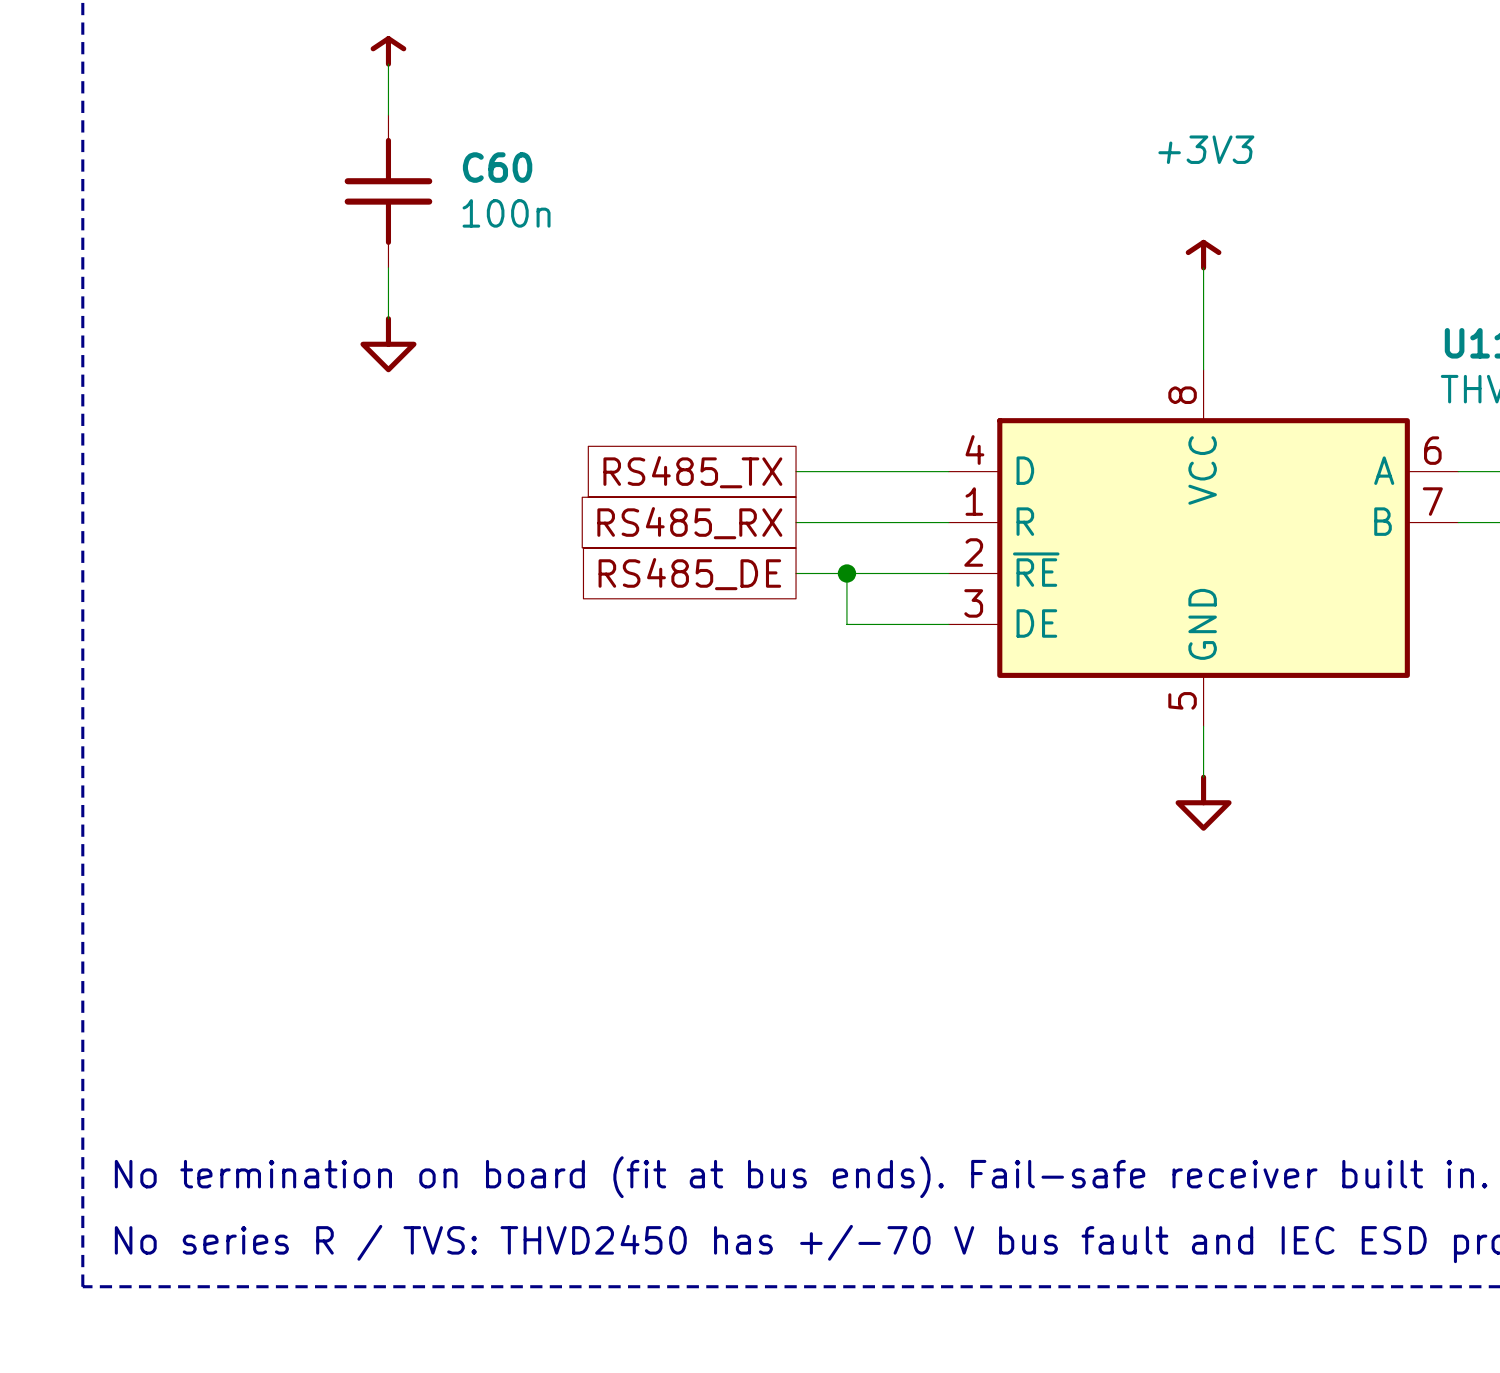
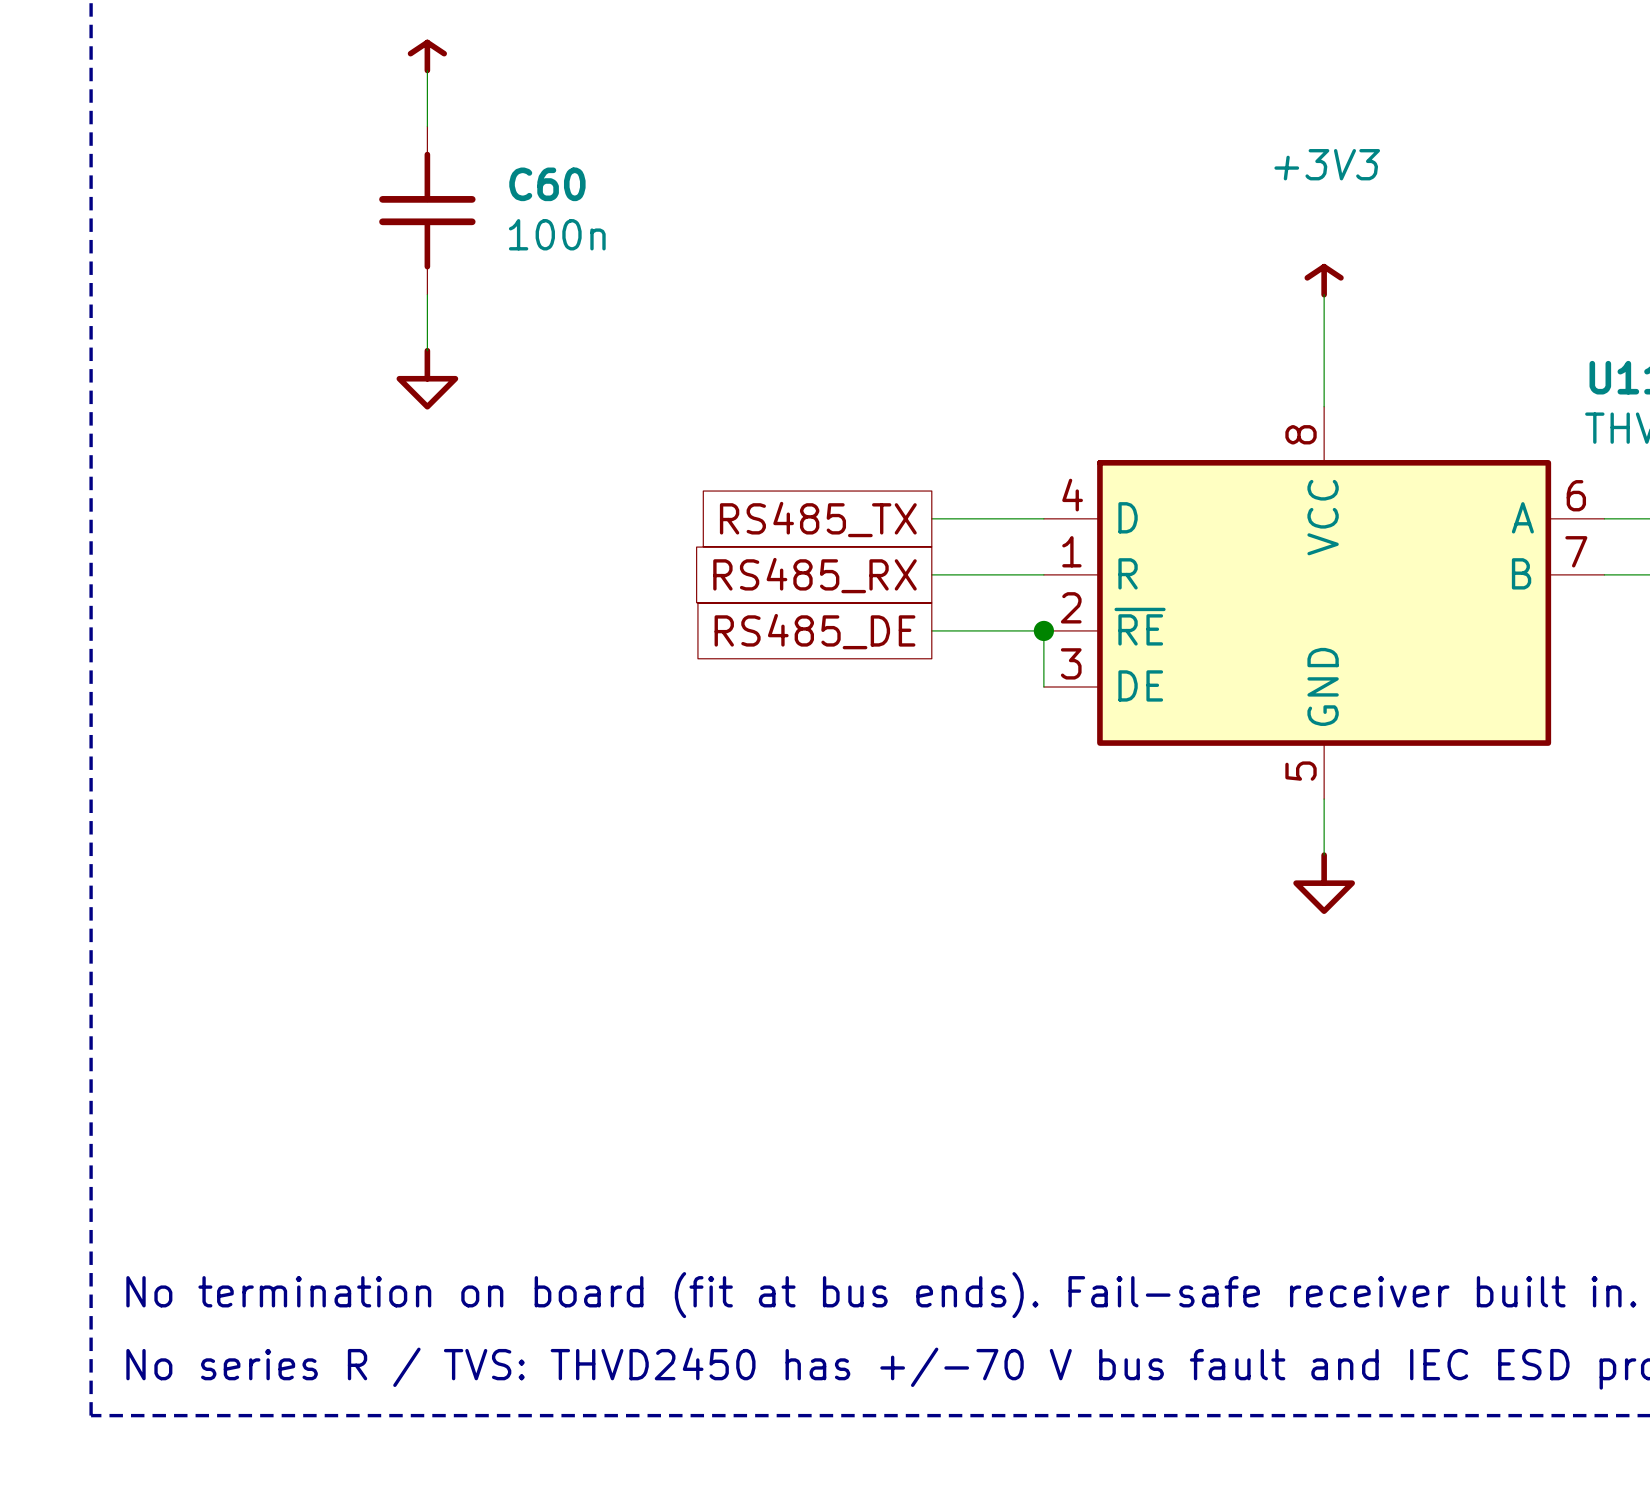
wire: (796, 471) (846, 471) -> none
global label position: RS485_TX (692, 472) -> RS485_TX (818, 519)
wire: (796, 522) (846, 522) -> none
global label position: RS485_RX (689, 523) -> RS485_RX (814, 575)
wire: (796, 573) (846, 573) (846, 624) (948, 624) -> (1043, 630) (1043, 686)
junction position: (846, 573) -> (1043, 630)
global label position: RS485_DE (689, 574) -> RS485_DE (814, 631)

